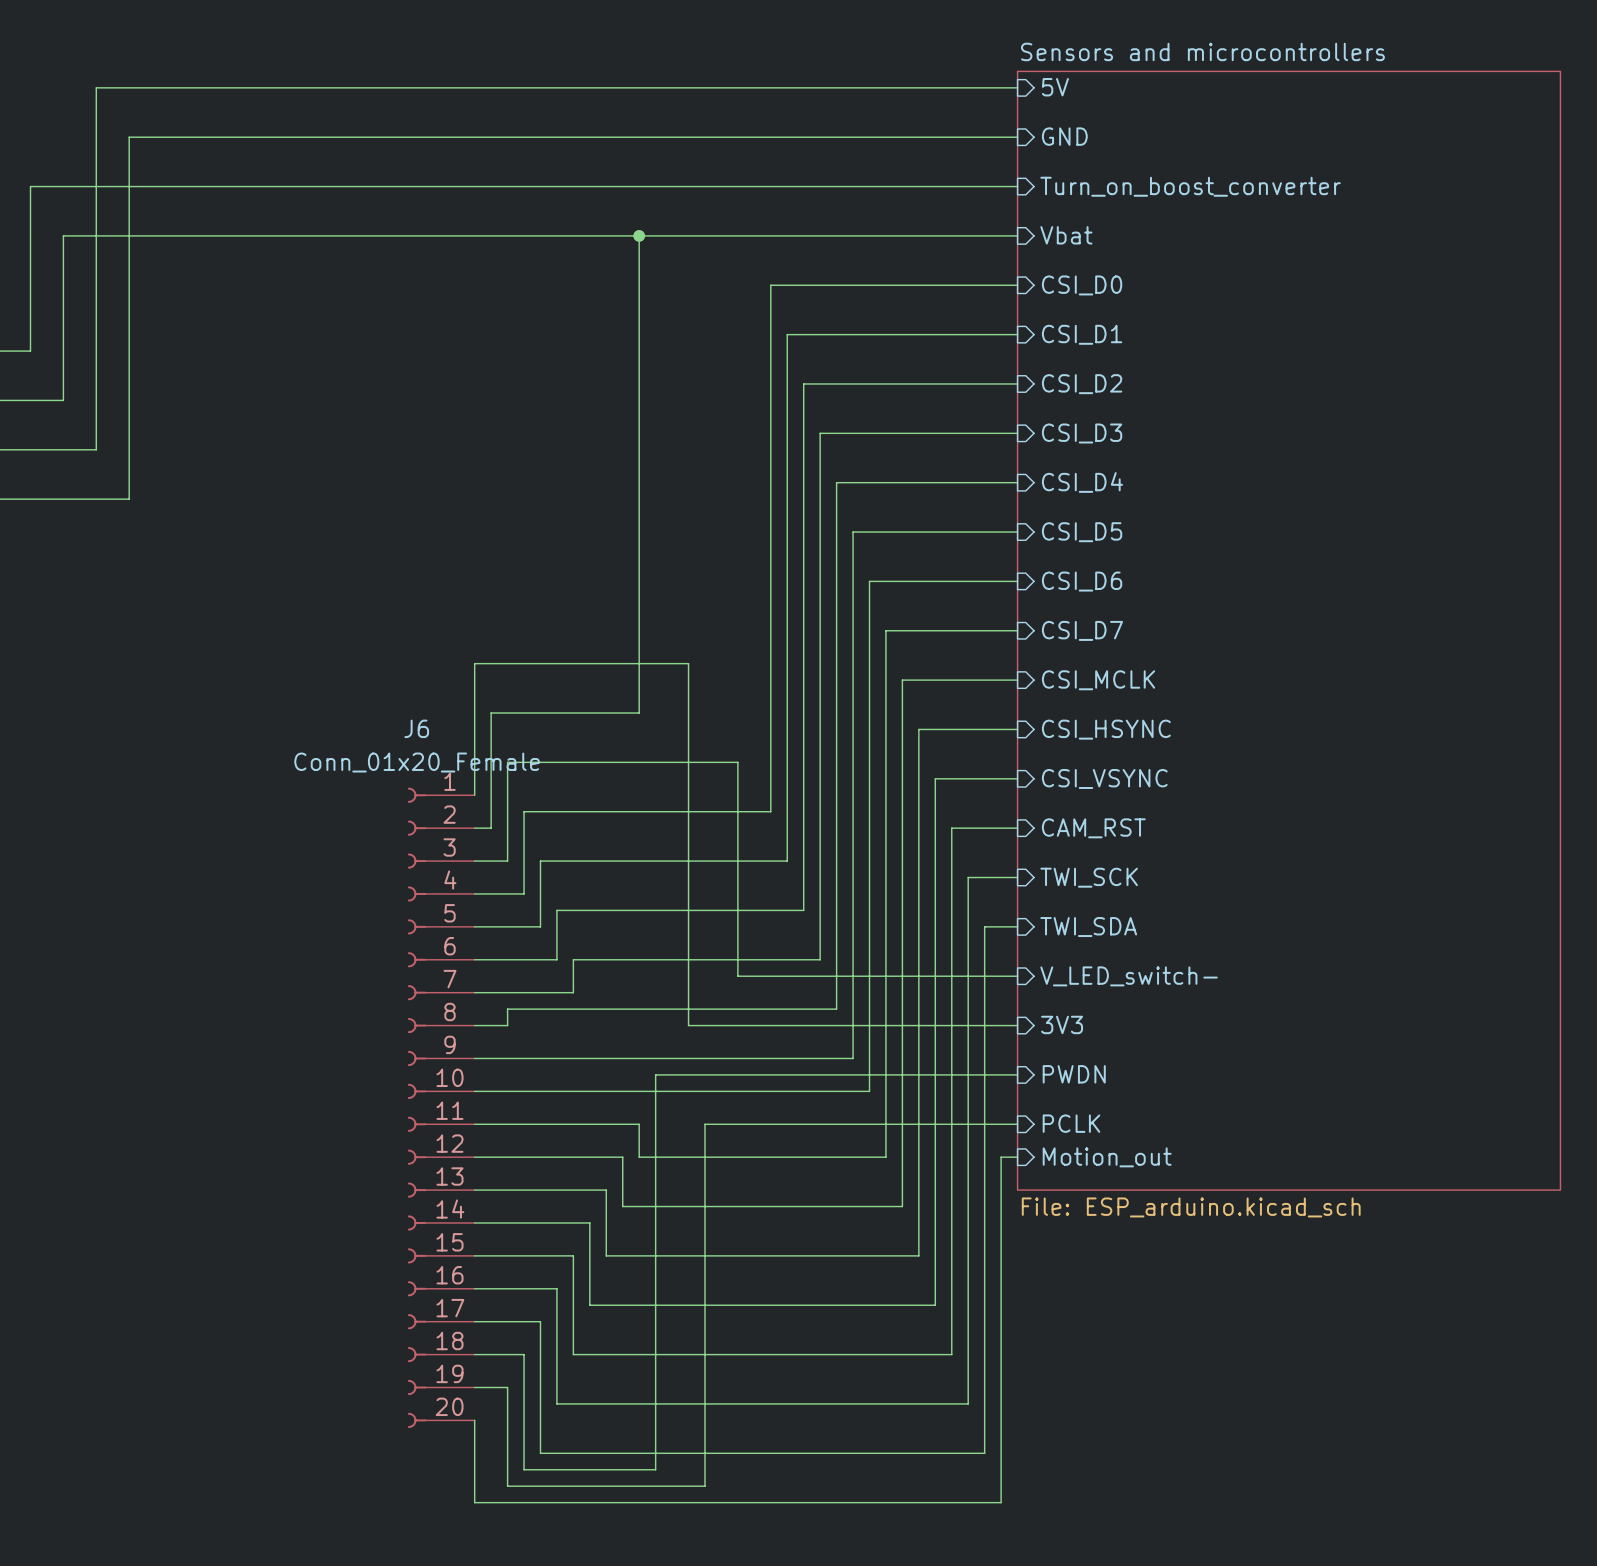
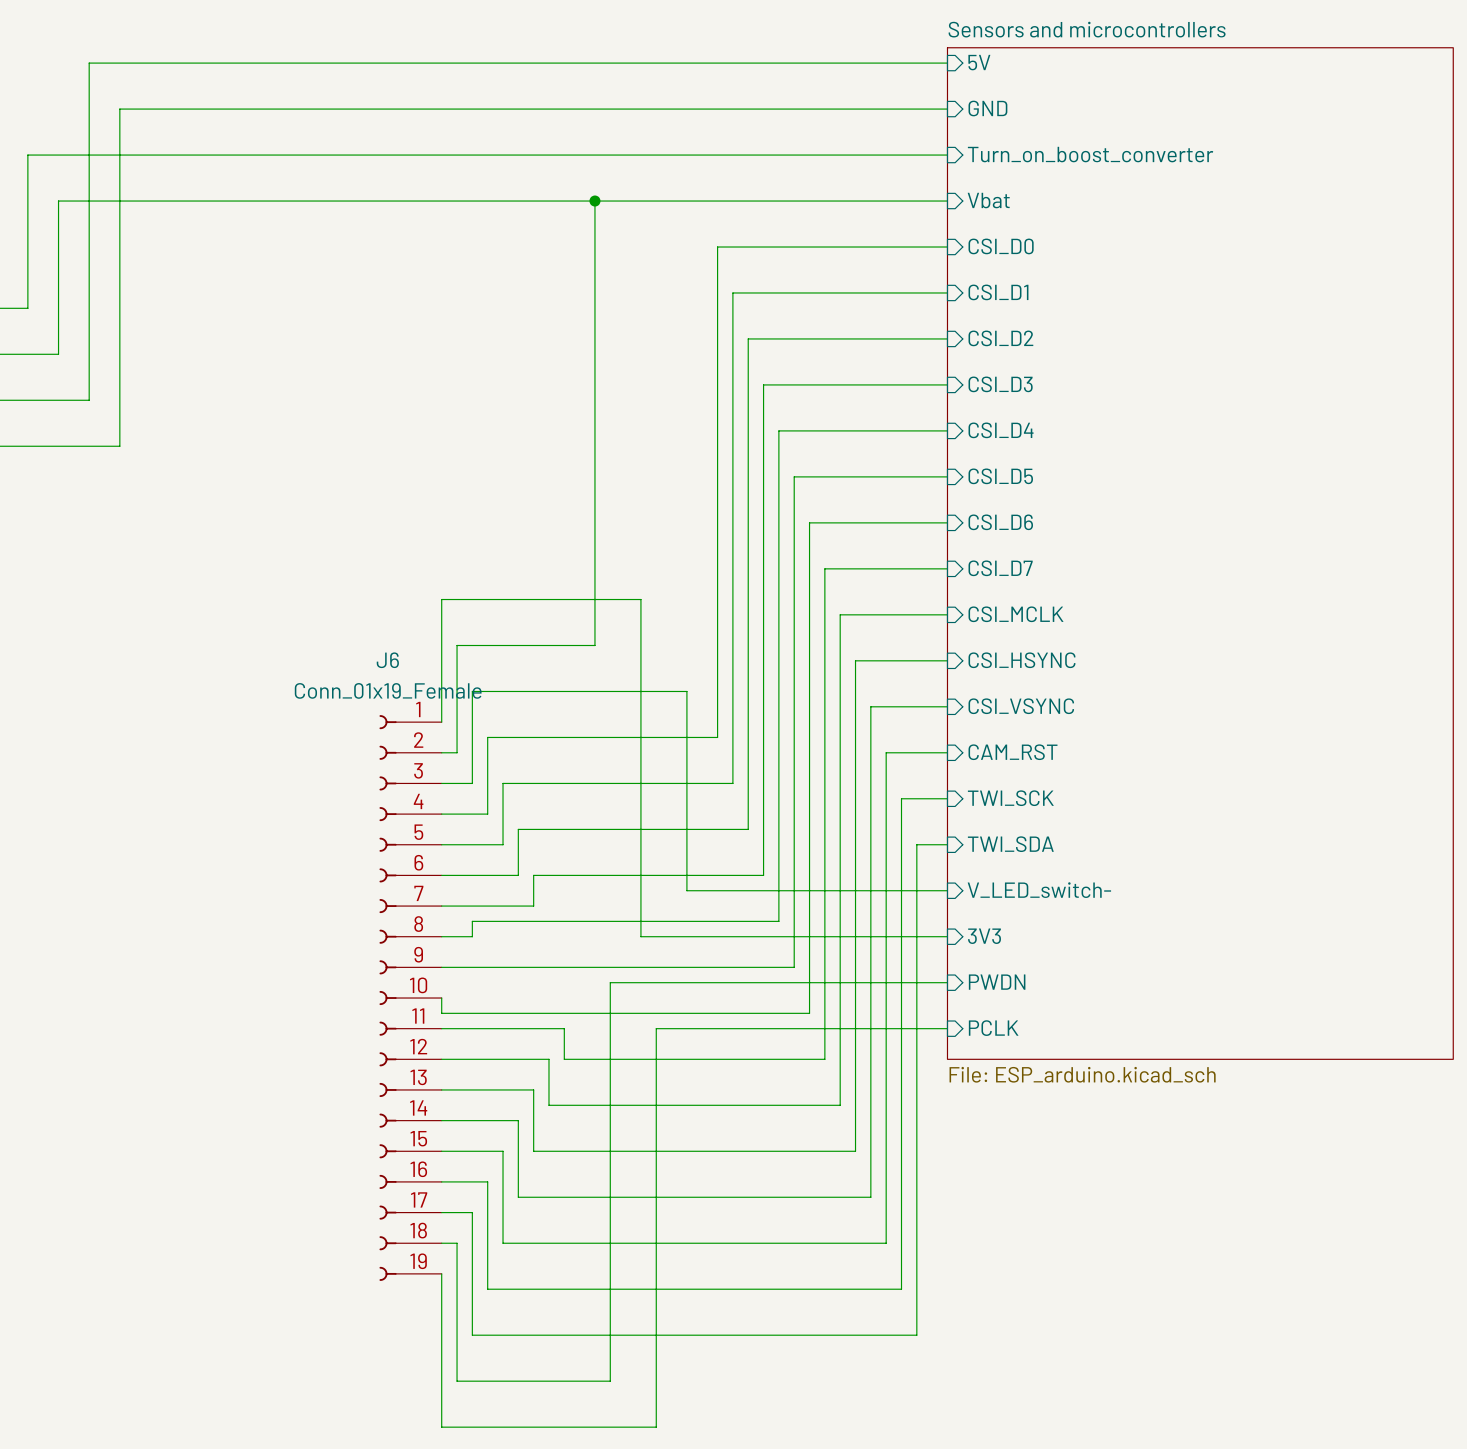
sheet Sensors and microcontrollers: none -> File: ESP_arduino.kicad_sch (1200, 553)
sheet Sensors and microcontrollers: File: ESP_arduino.kicad_sch (1289, 630) -> none
J6 value: Conn_01x20_Female (417, 762) -> Conn_01x19_Female (388, 690)
J6 symbol: [407, 787, 475, 1428] -> [379, 715, 442, 1281]
wire: (474, 1091) (869, 1091) -> (441, 998) (441, 1013) (809, 1013) (809, 998)
wire: (606, 1124) (639, 1124) (639, 1157) -> (564, 1028) (564, 1059)
wire: (589, 1157) (606, 1157) -> (579, 1059) (594, 1059)
wire: (622, 1157) (622, 1206) -> (548, 1059) (548, 1105) (579, 1105)
wire: (1017, 1157) (1001, 1157) (1001, 1502) (655, 1502) -> none
sheet pin: Motion_out (1107, 1157) -> none
wire: (573, 1190) (606, 1190) (606, 1255) -> (533, 1089) (533, 1151) (564, 1151)
wire: (556, 1222) (589, 1222) (589, 1305) -> (518, 1120) (518, 1181)
wire: (540, 1255) (573, 1255) (573, 1354) -> (503, 1151) (503, 1212)
wire: (524, 1288) (556, 1288) -> (487, 1181) (487, 1243)
wire: (556, 1305) (556, 1403) -> (487, 1289) (518, 1289)
wire: none -> (518, 1197) (548, 1197)
wire: (507, 1321) (540, 1321) -> (472, 1212) (472, 1273)
wire: (491, 1354) (524, 1354) -> (503, 1243) (533, 1243)
wire: (540, 1354) (540, 1453) -> (472, 1335) (503, 1335)
wire: (474, 1387) (507, 1387) -> (441, 1273) (441, 1304)
wire: (524, 1403) (524, 1469) (655, 1469) -> (610, 1381) (610, 1350)
wire: (507, 1453) (507, 1486) (704, 1486) -> (441, 1381) (441, 1427) (656, 1427) (656, 1365)
wire: (474, 1502) (491, 1502) -> (457, 1243) (457, 1381)

